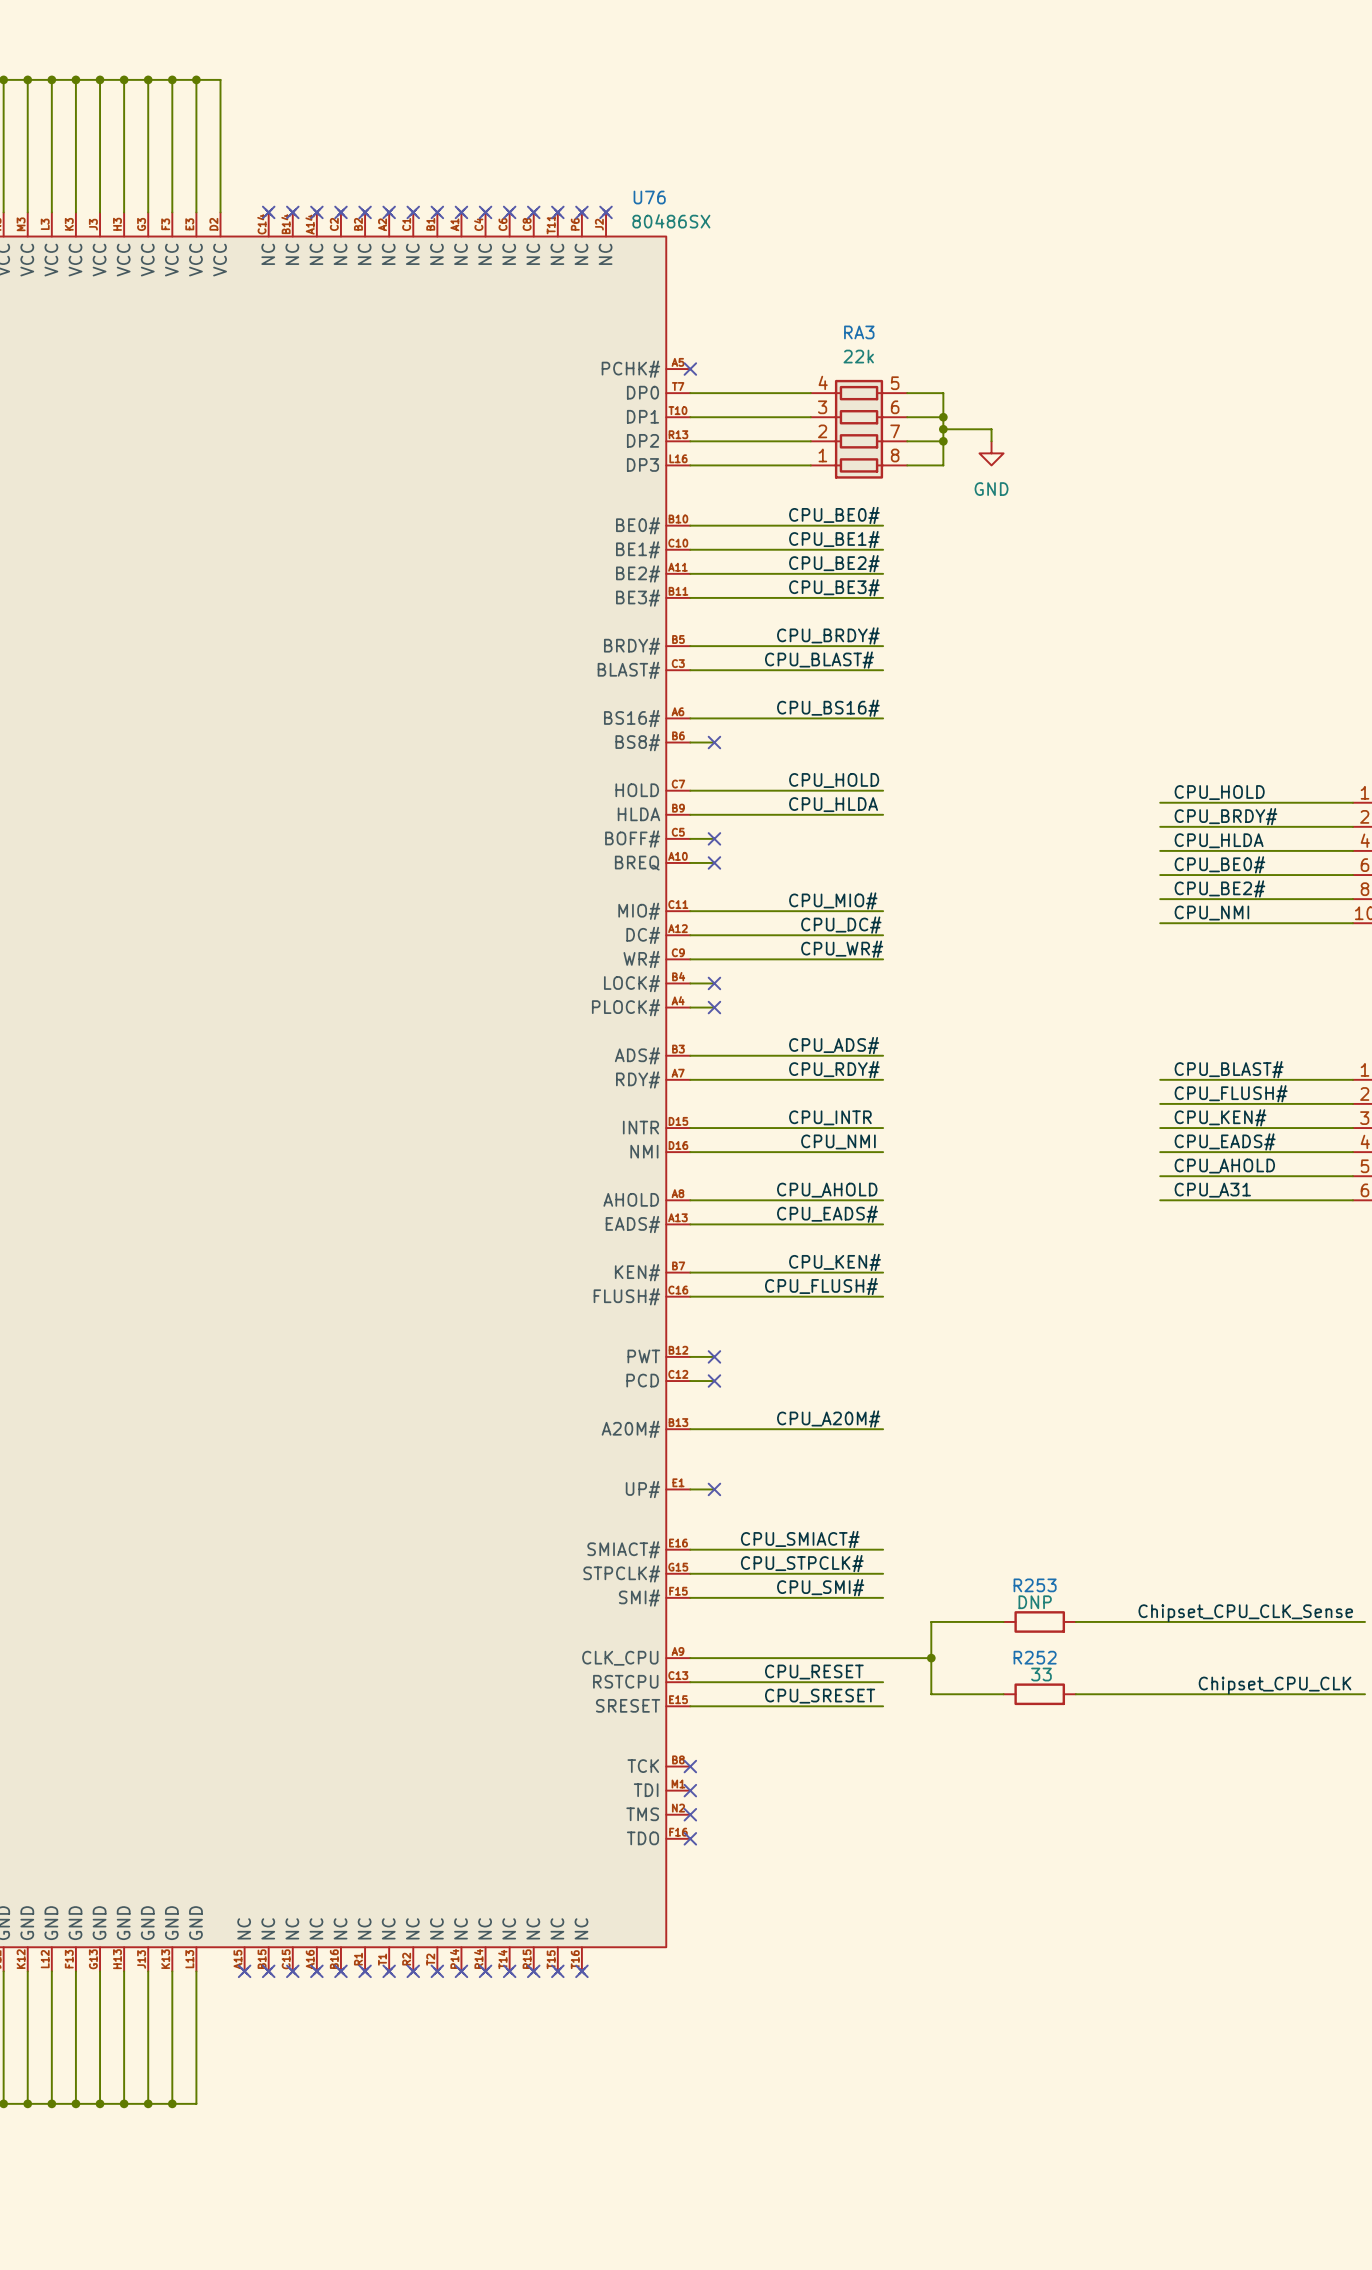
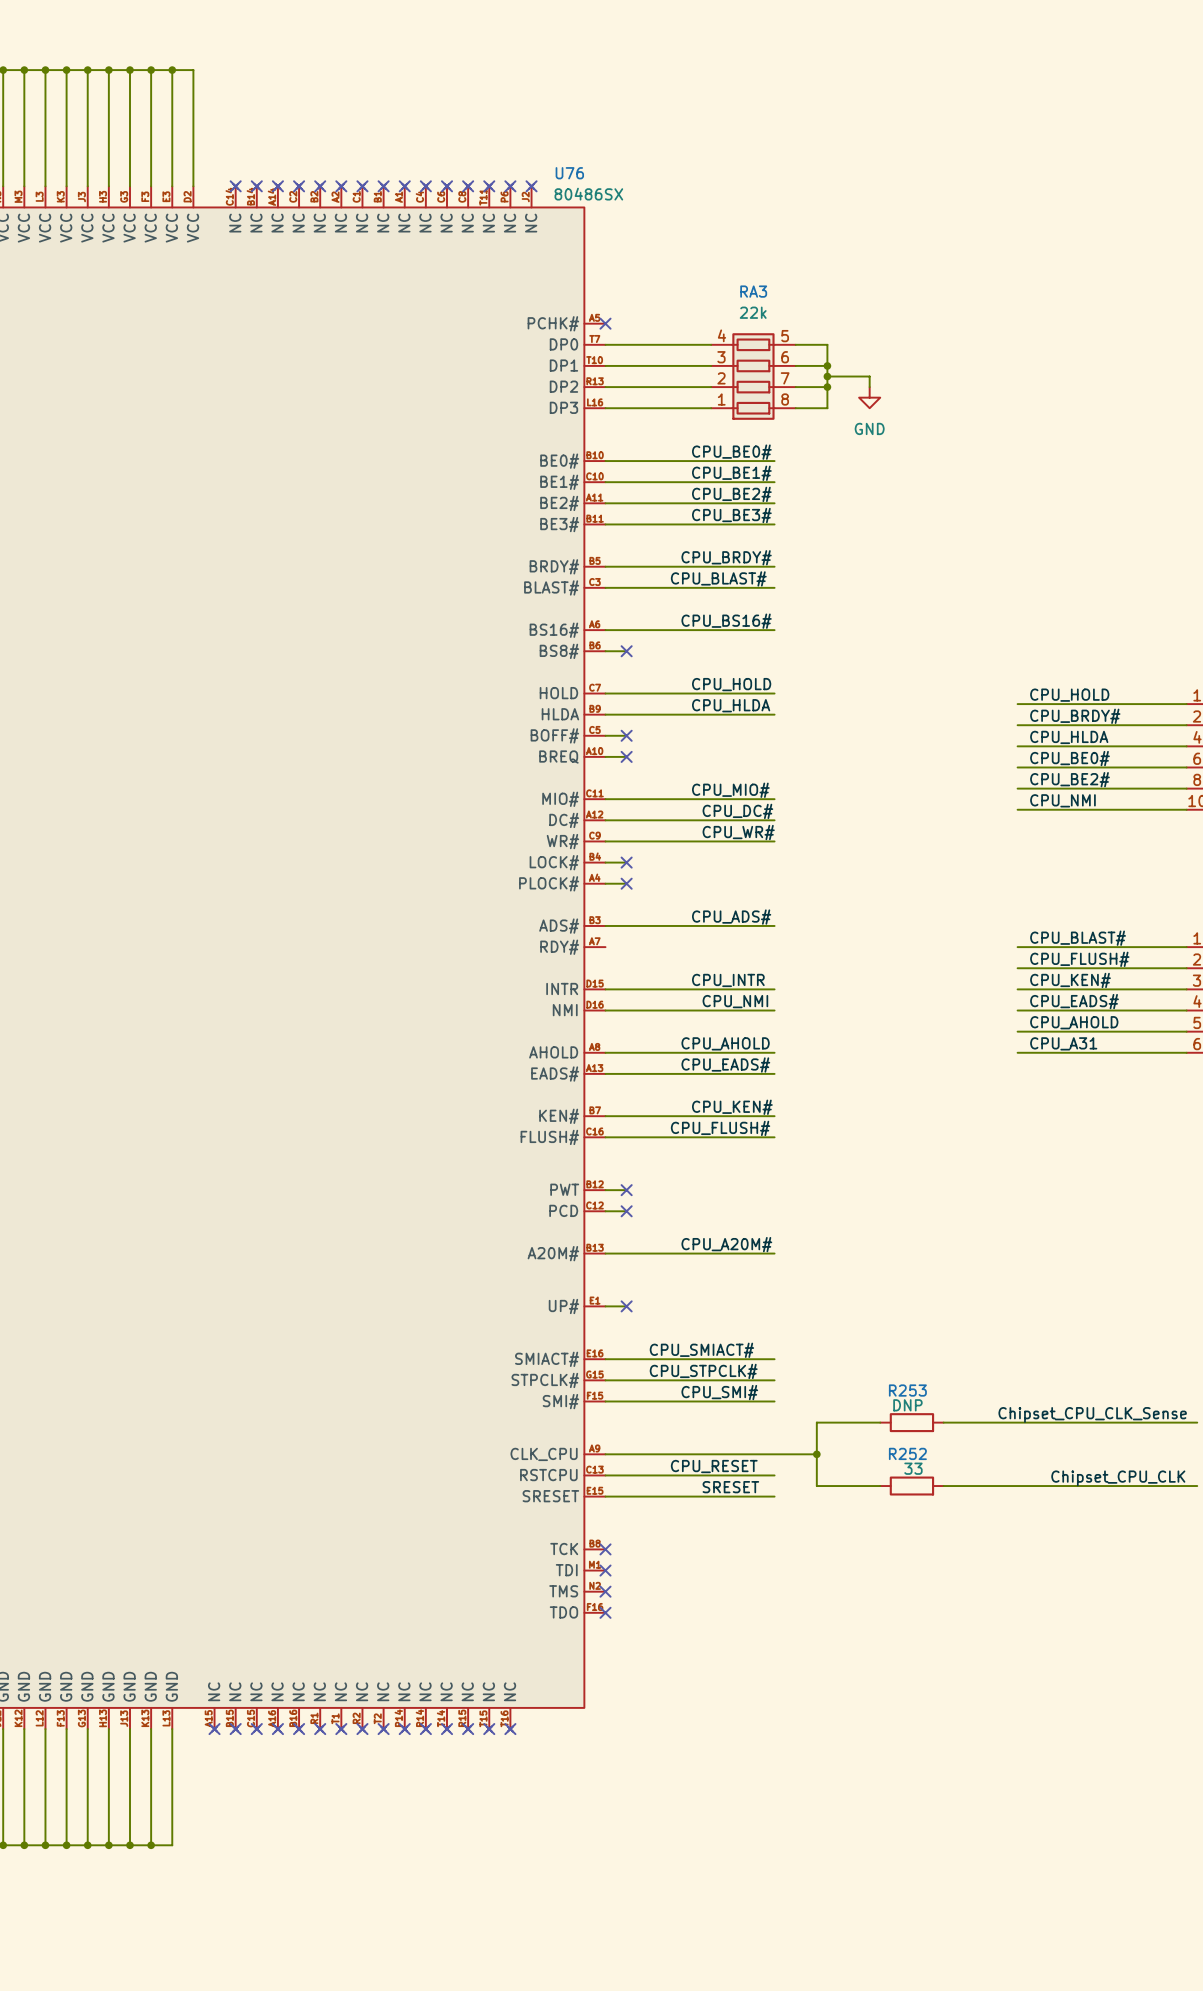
label: CPU_RDY# (834, 1069) -> none
wire: (690, 1079) (883, 1079) -> none
label: CPU_SRESET (820, 1696) -> SRESET (730, 1487)

